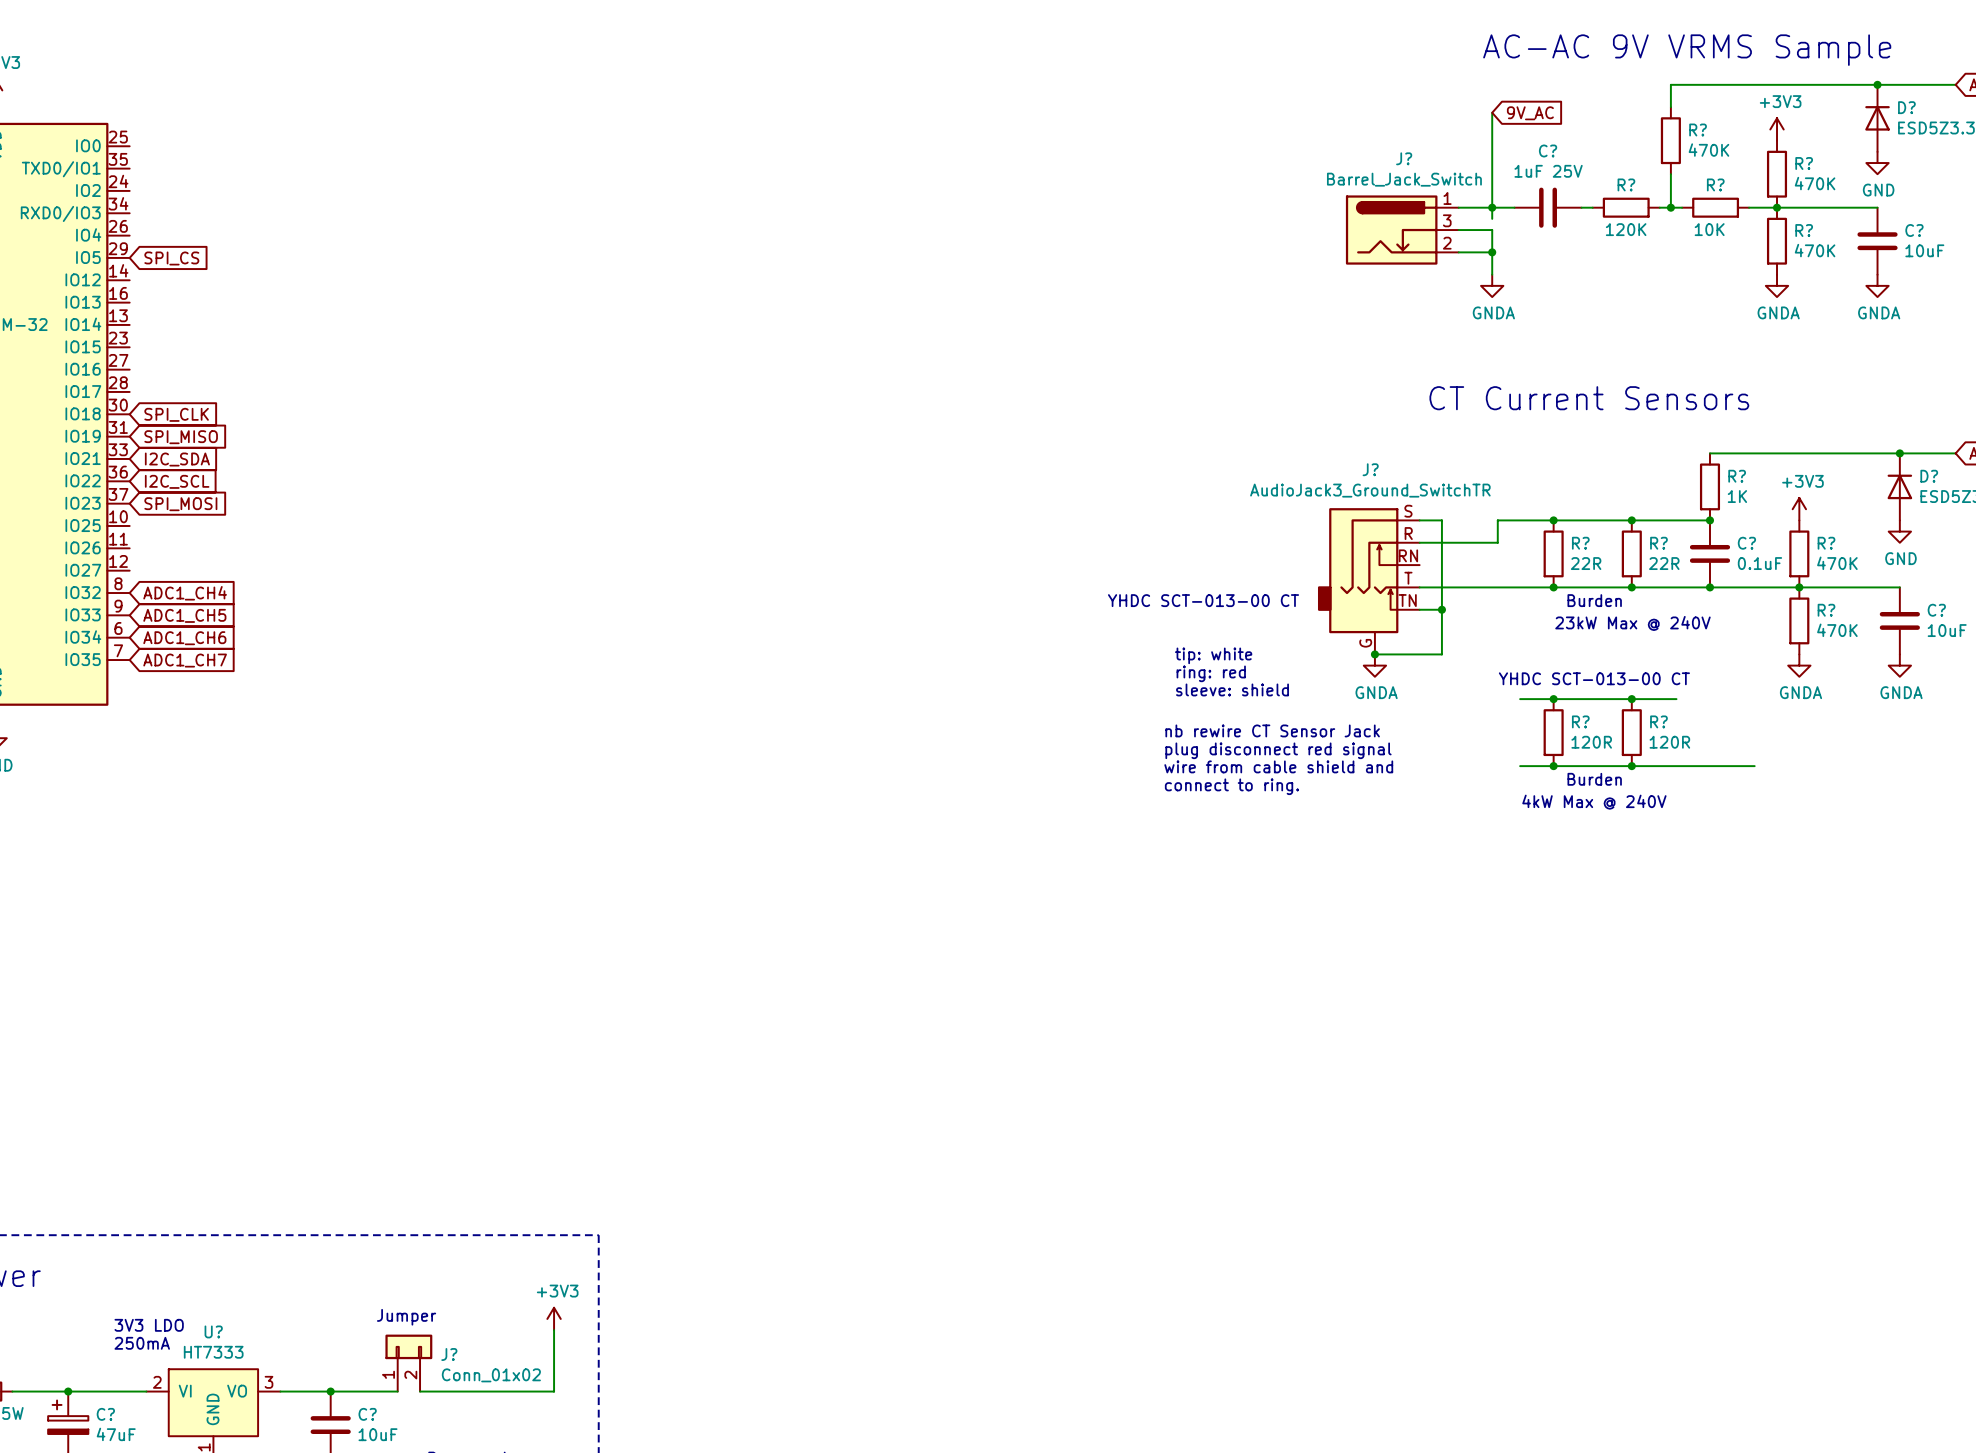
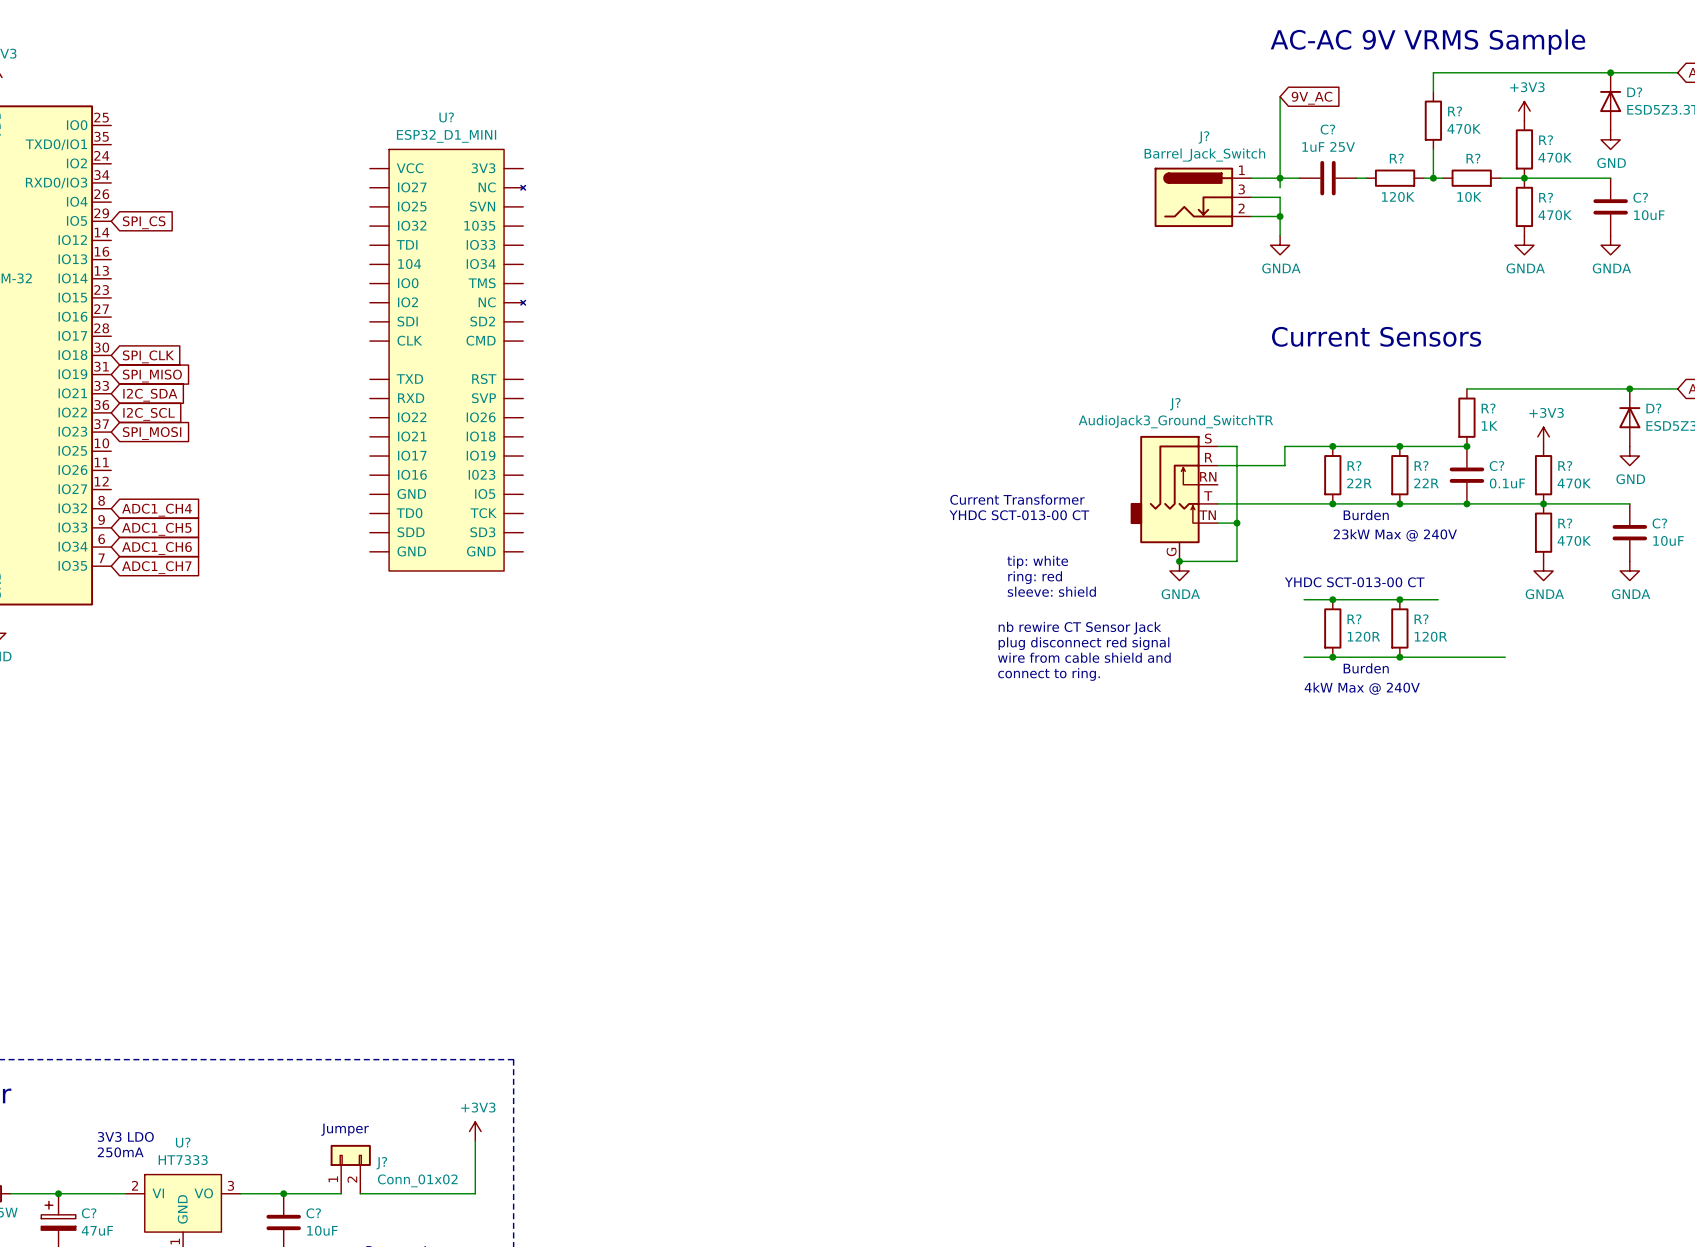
text: CT Current Sensors (1589, 398) -> Current Sensors (1376, 336)
U?: none -> ESP32_D1_MINI (447, 360)
text: none -> Current Transformer (1017, 499)

